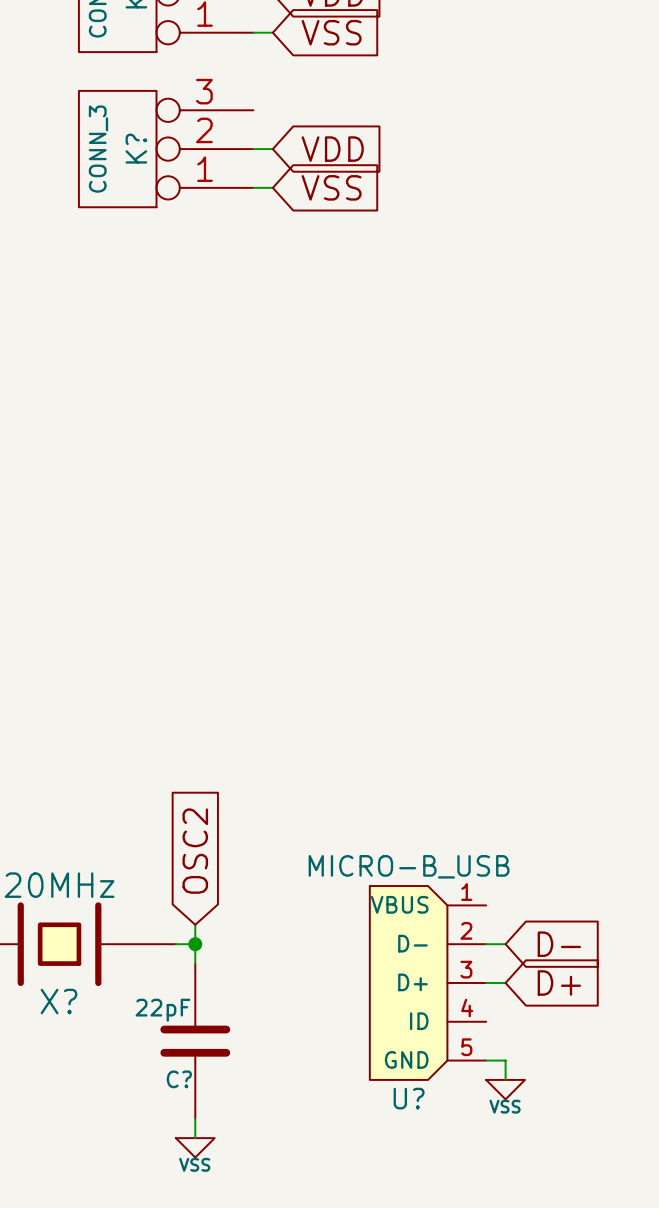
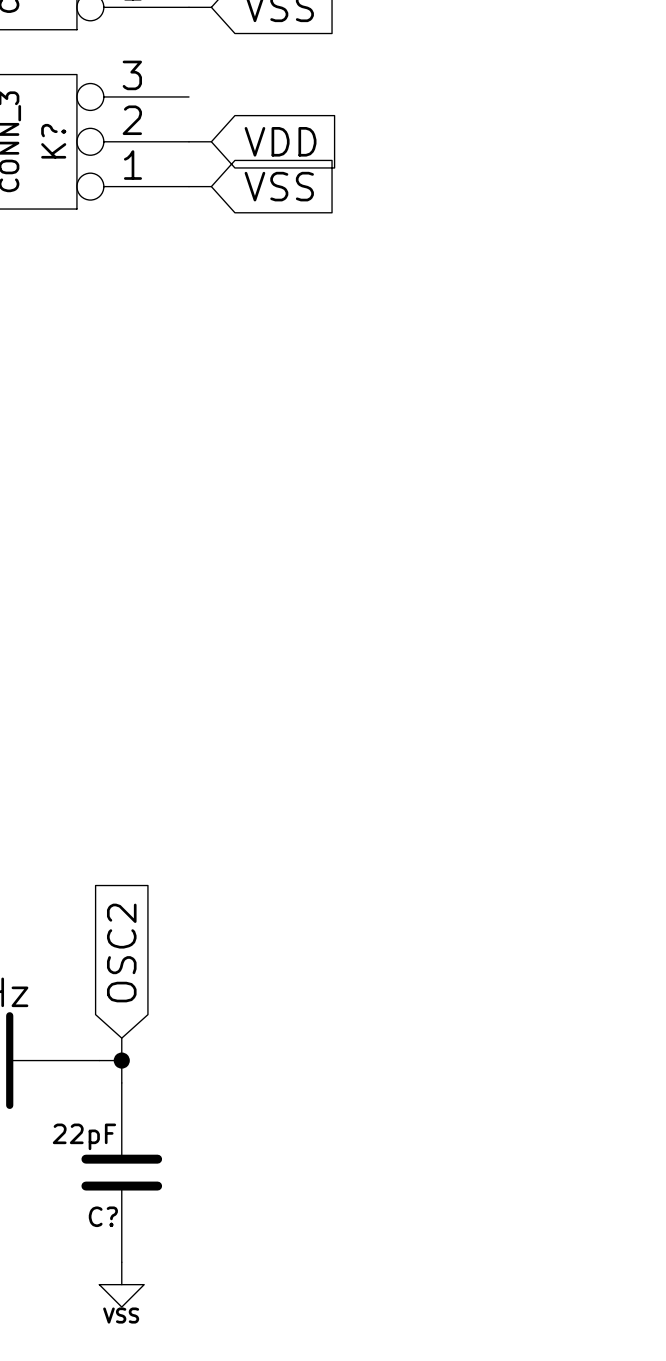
wire: (486, 944) (505, 944) -> none
global label: D- (559, 944) -> none
U?: MICRO-B_USB (428, 982) -> none
wire: (486, 982) (505, 982) -> none
global label: D+ (559, 982) -> none
wire: (486, 1060) (505, 1060) (505, 1079) -> none
power symbol: VSS (505, 1089) -> none

